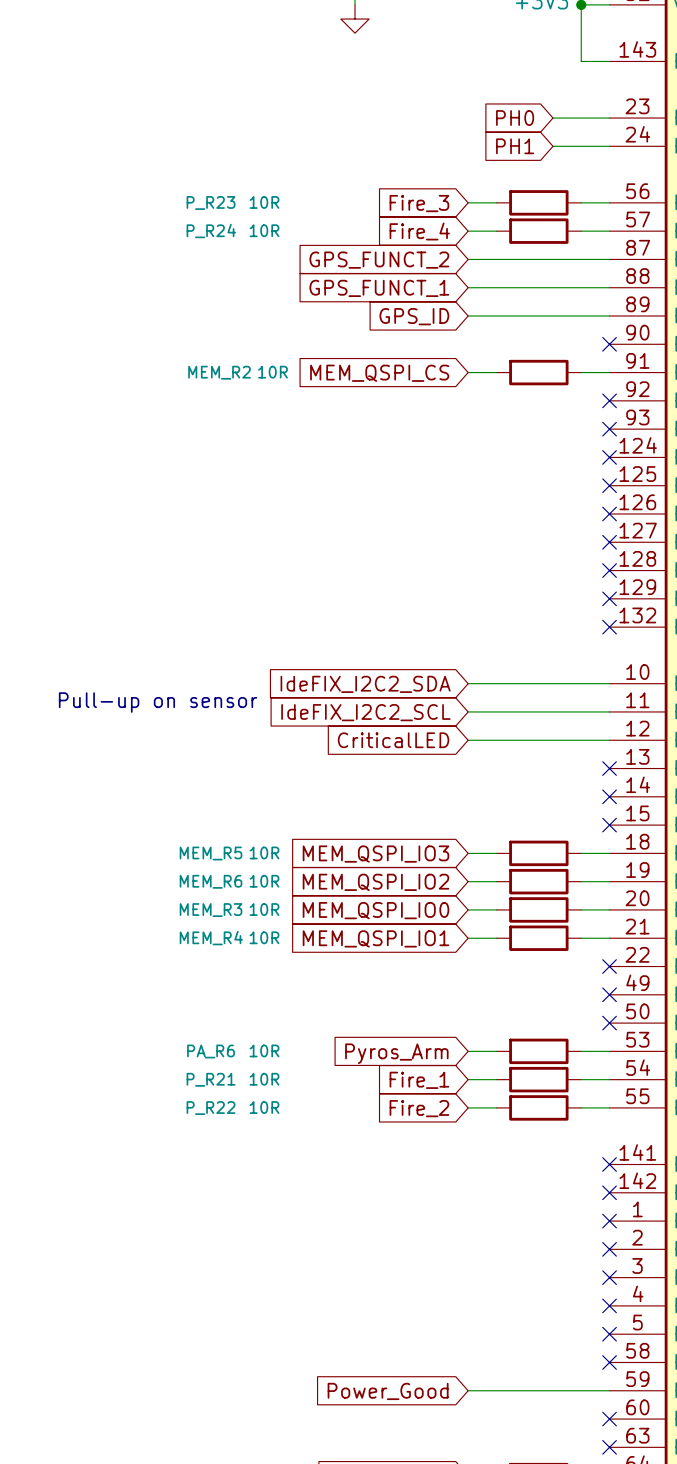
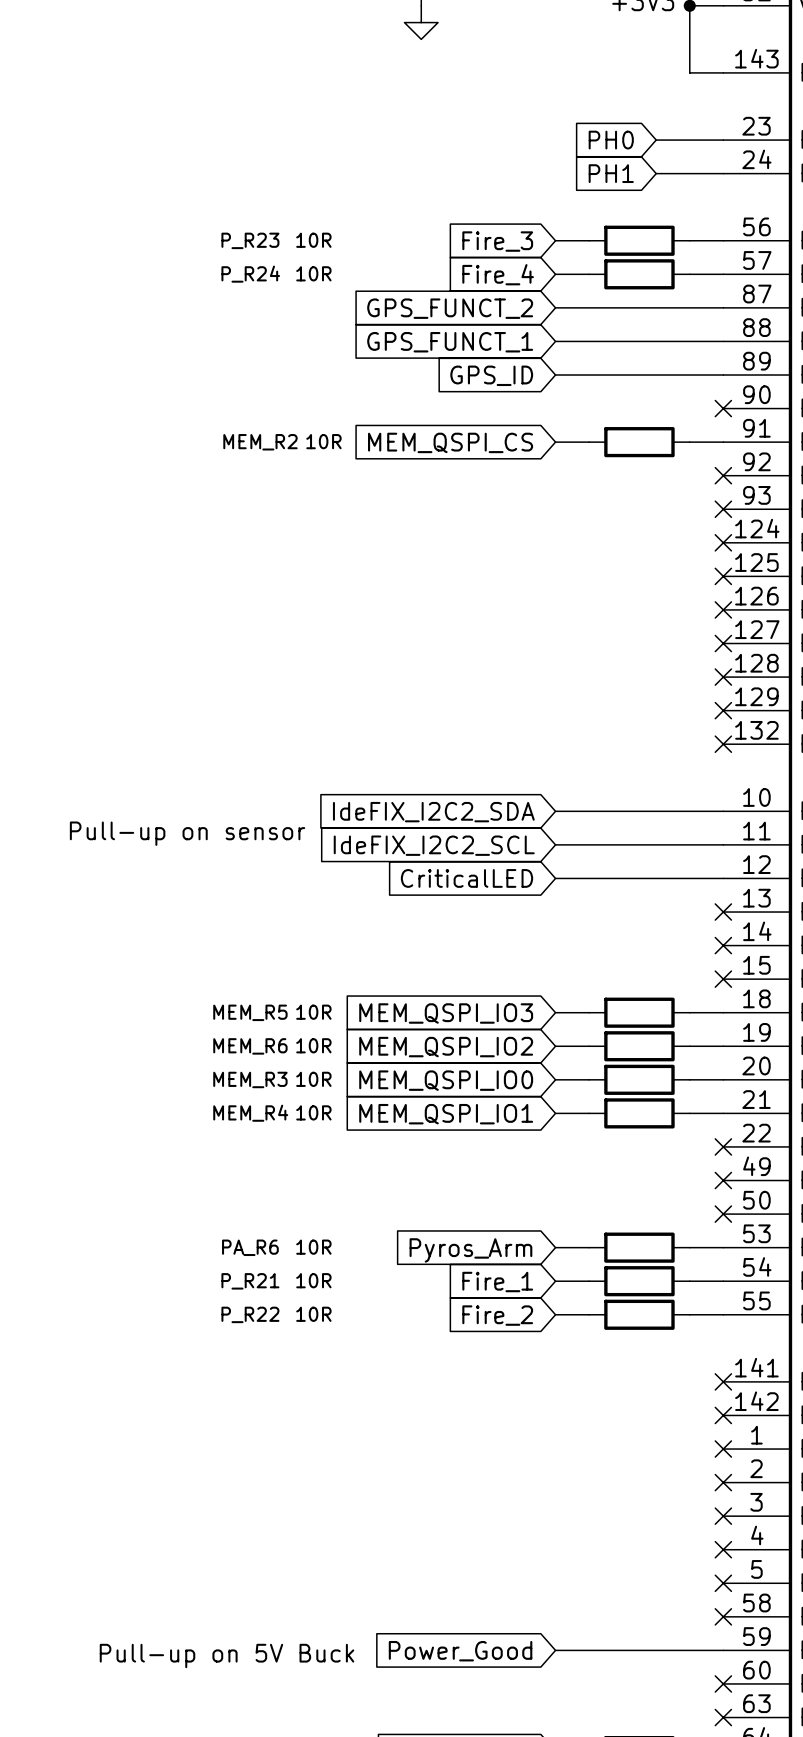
text: none -> Pull-up on 5V Buck (227, 1655)

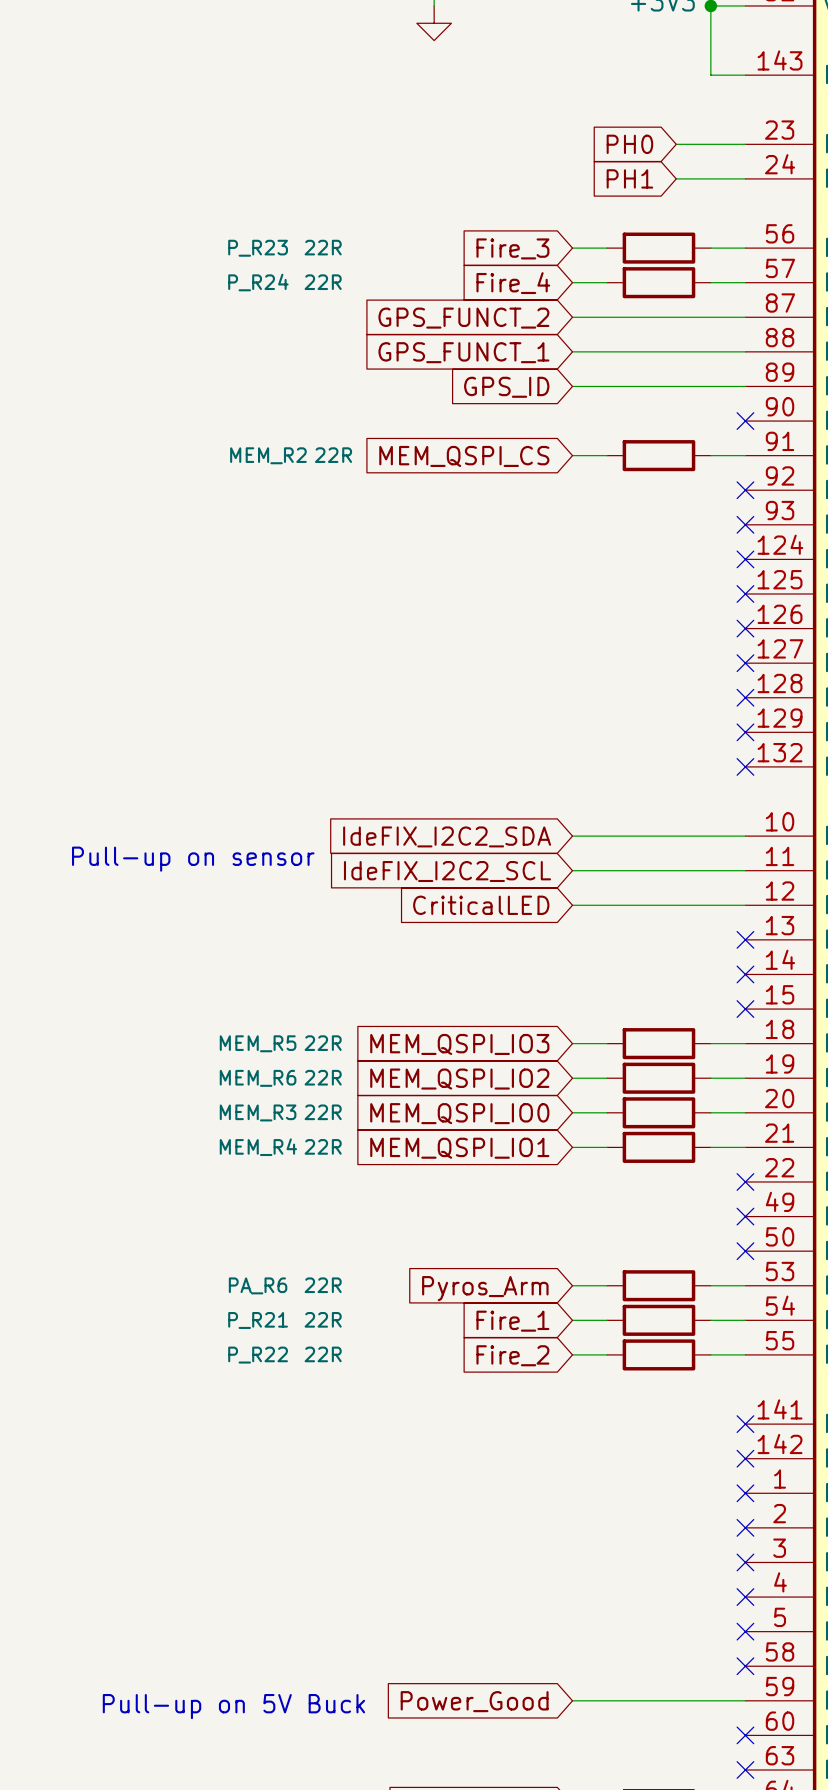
P_R23 value: 10R (313, 240) -> 22R (323, 247)
P_R24 value: 10R (313, 273) -> 22R (323, 282)
MEM_R2 value: 10R (323, 441) -> 22R (333, 455)
MEM_R5 value: 10R (313, 1012) -> 22R (323, 1043)
MEM_R6 value: 10R (313, 1045) -> 22R (323, 1077)
MEM_R3 value: 10R (313, 1079) -> 22R (323, 1112)
MEM_R4 value: 10R (313, 1112) -> 22R (323, 1146)
PA_R6 value: 10R (313, 1247) -> 22R (323, 1285)
P_R21 value: 10R (313, 1280) -> 22R (323, 1319)
P_R22 value: 10R (313, 1314) -> 22R (323, 1354)

